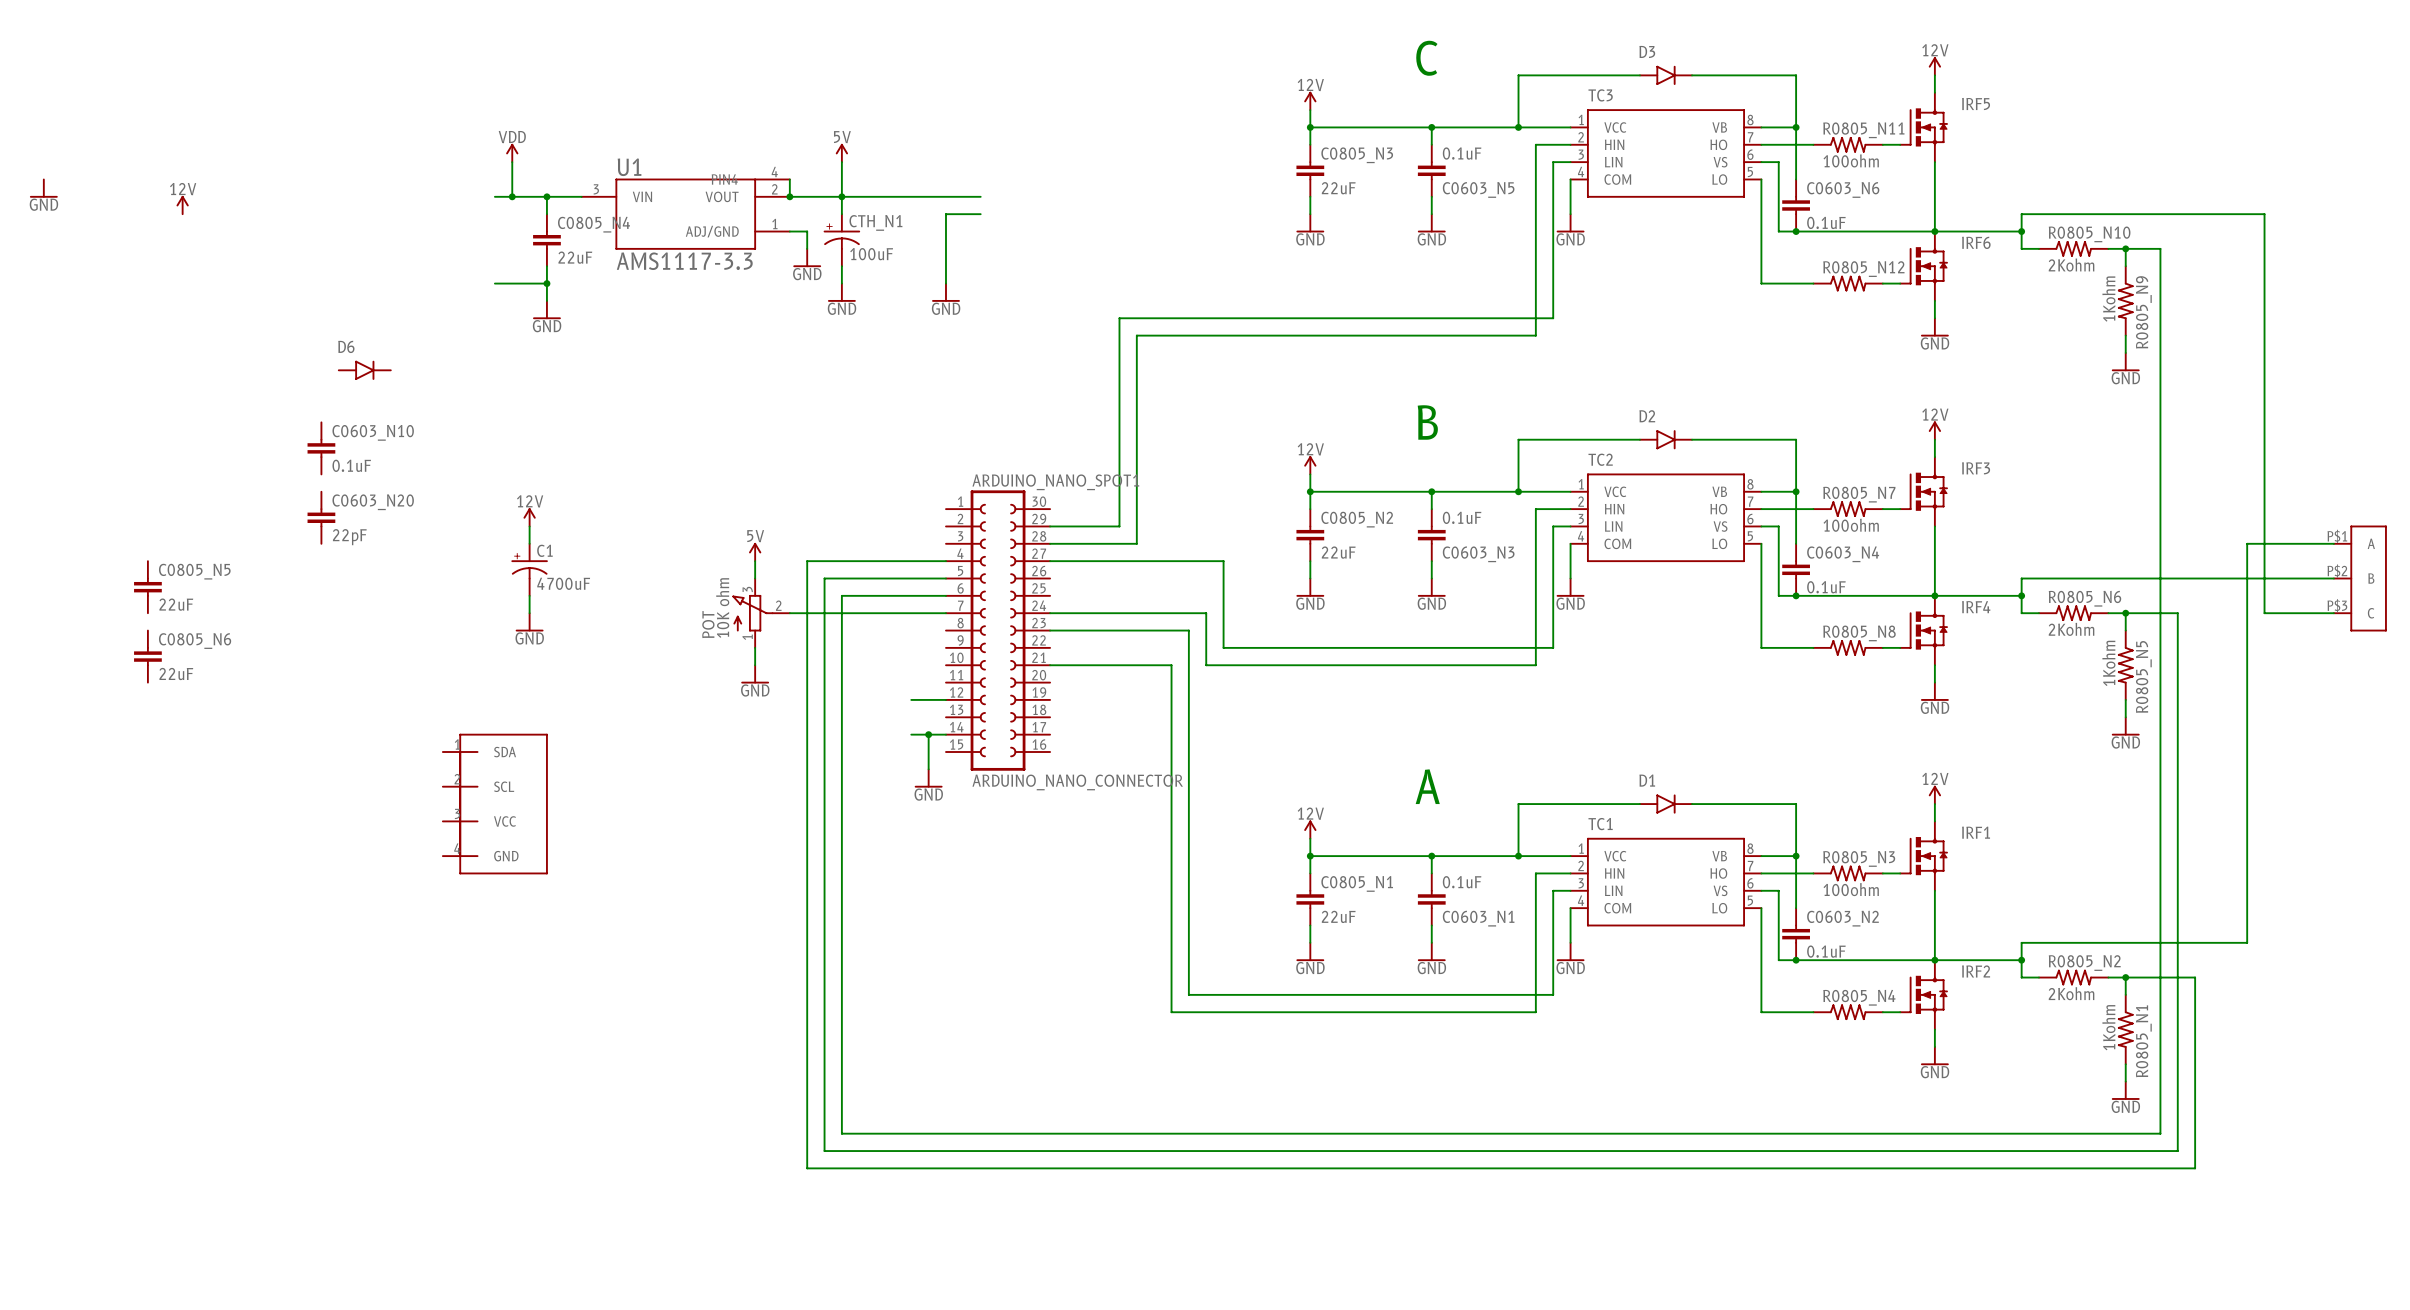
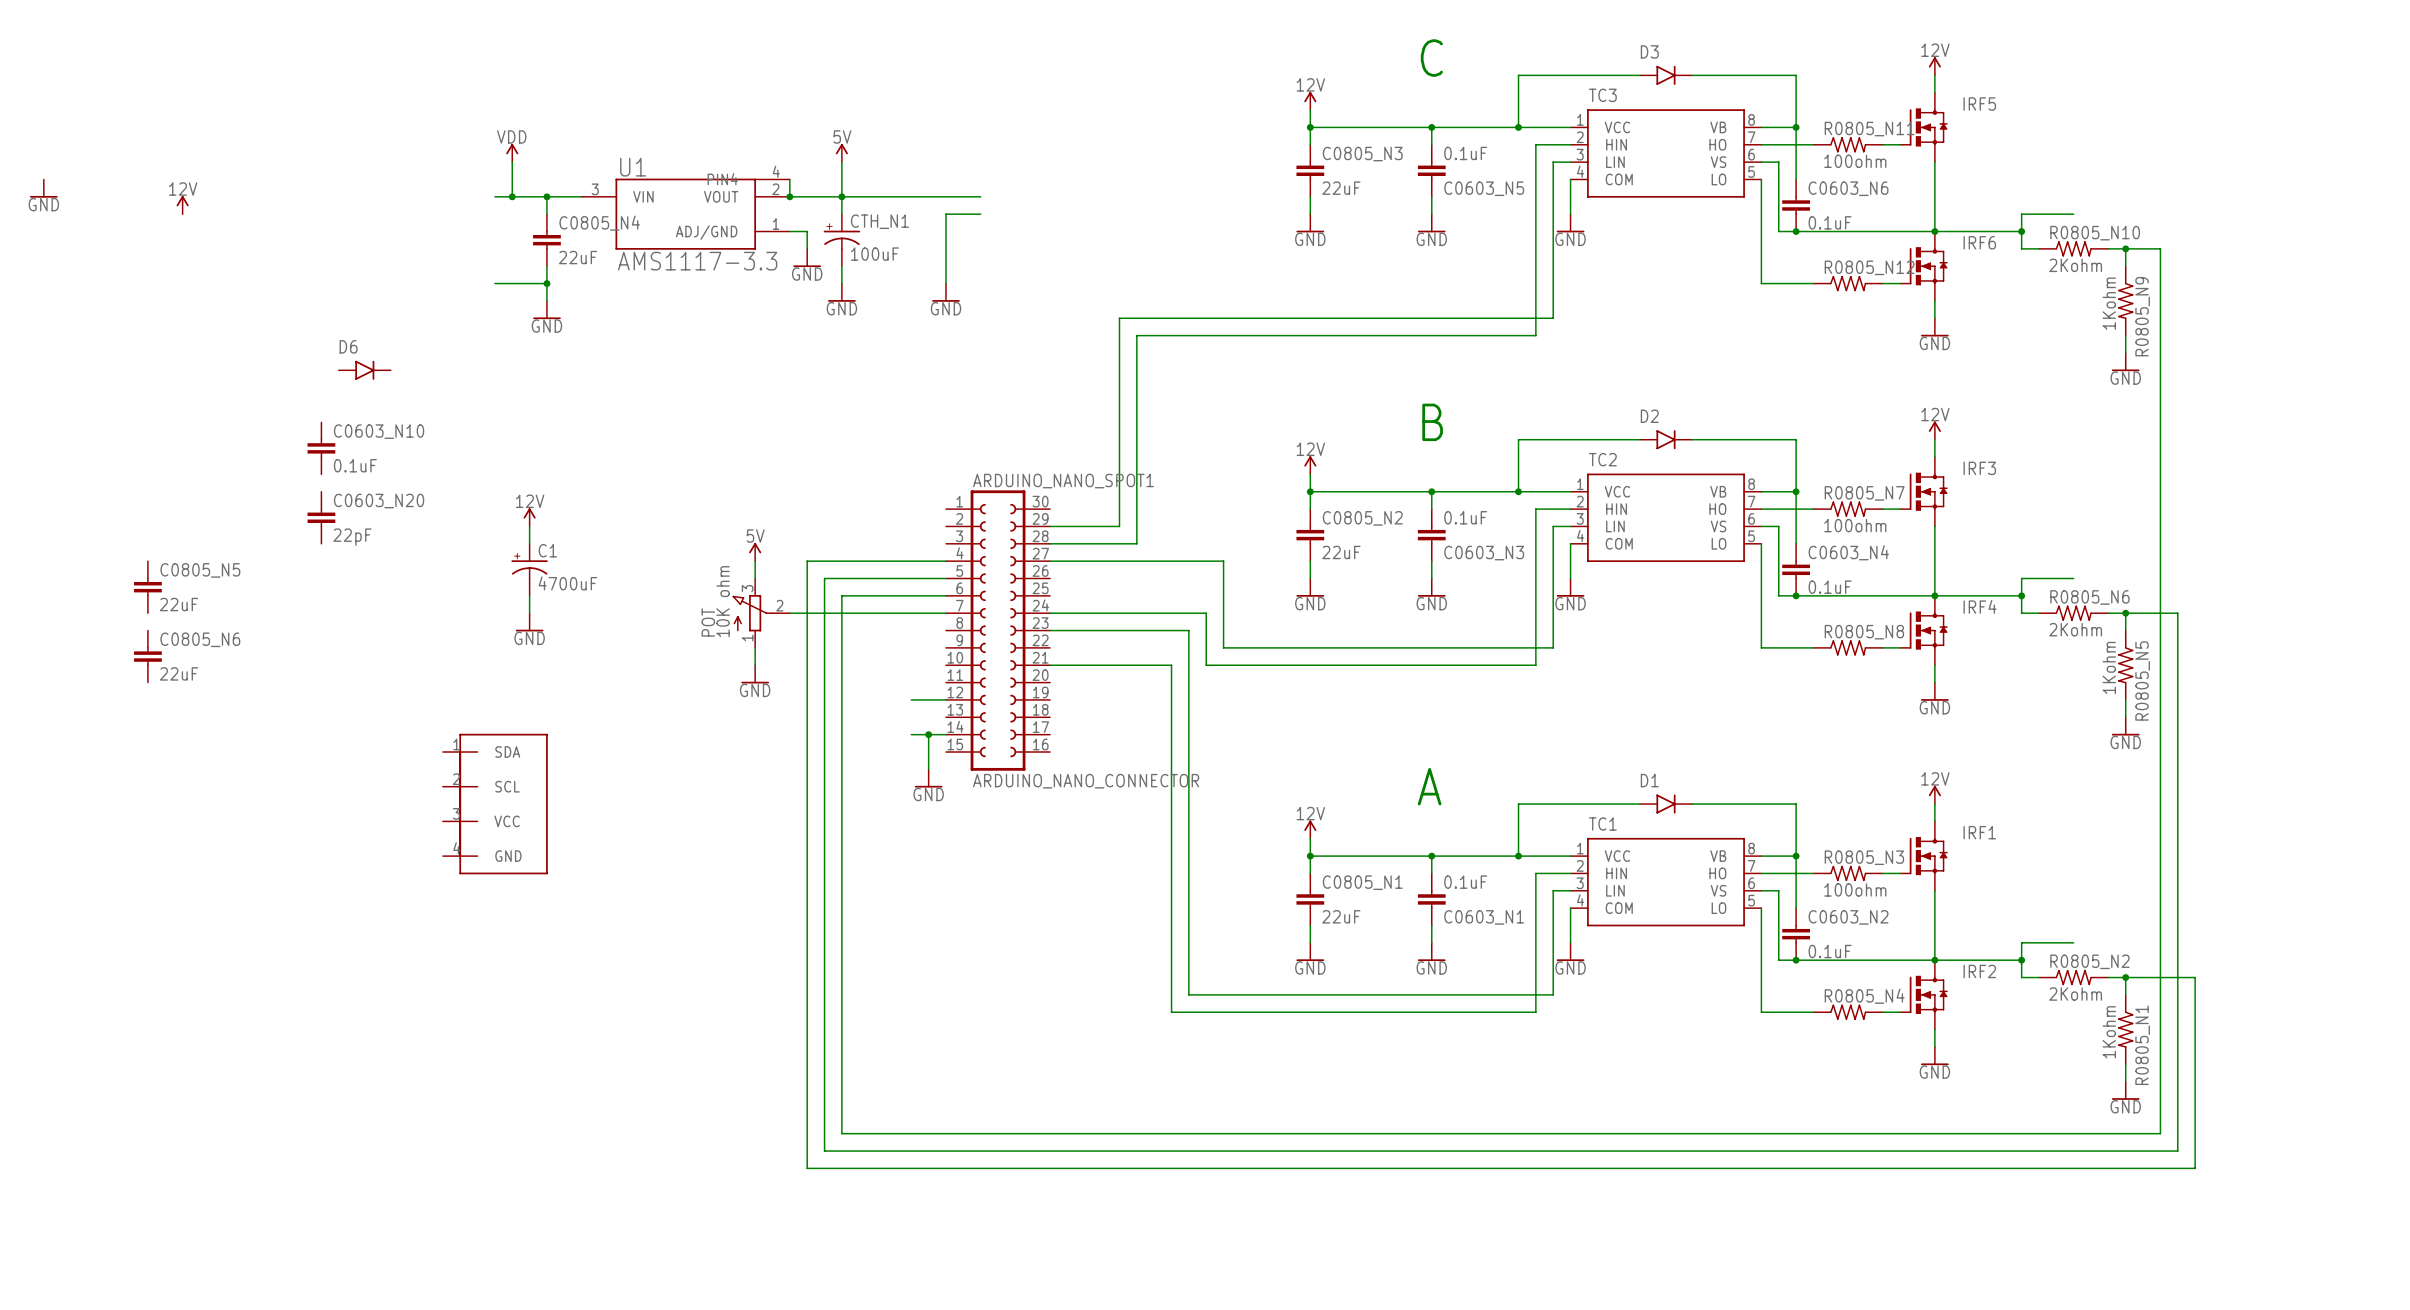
wire: (2073, 214) (2264, 214) (2264, 613) (2333, 613) -> none
wire: (2333, 543) (2247, 543) (2247, 942) (2073, 942) -> none
wire: (2073, 578) (2333, 578) -> none
part: (2360, 578) -> none

